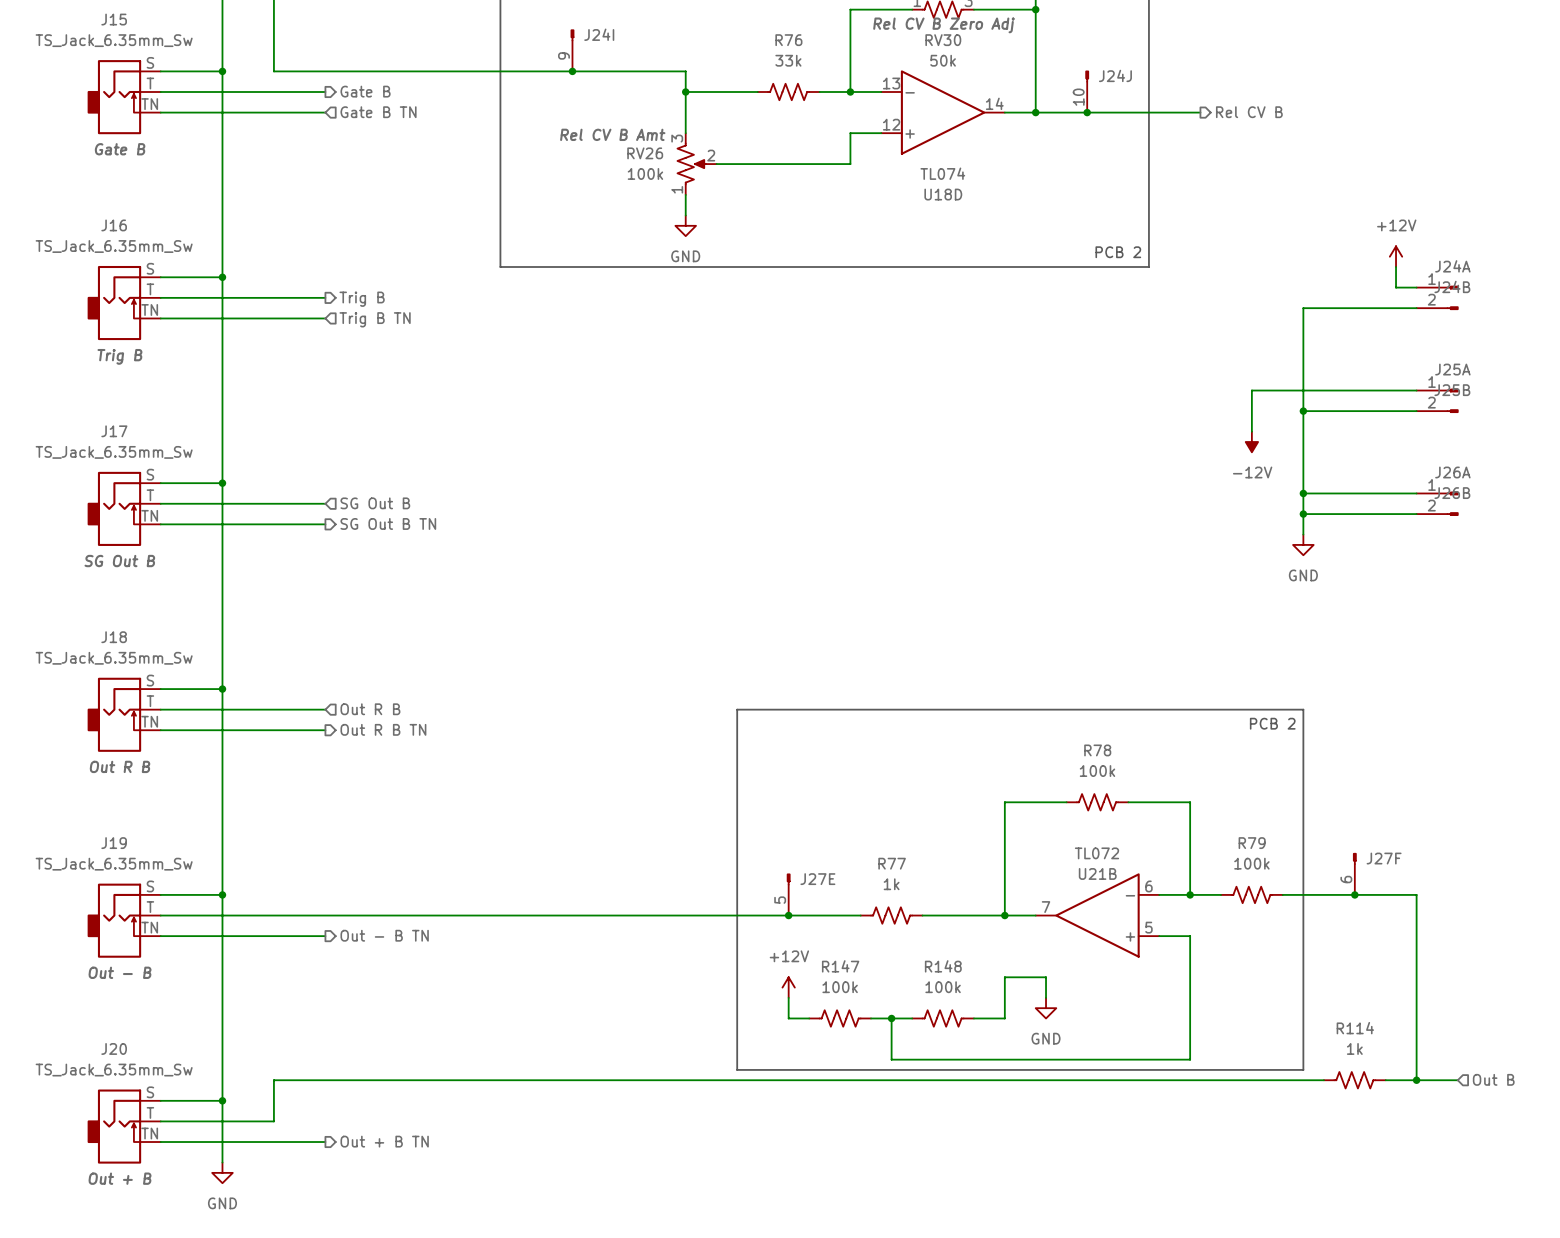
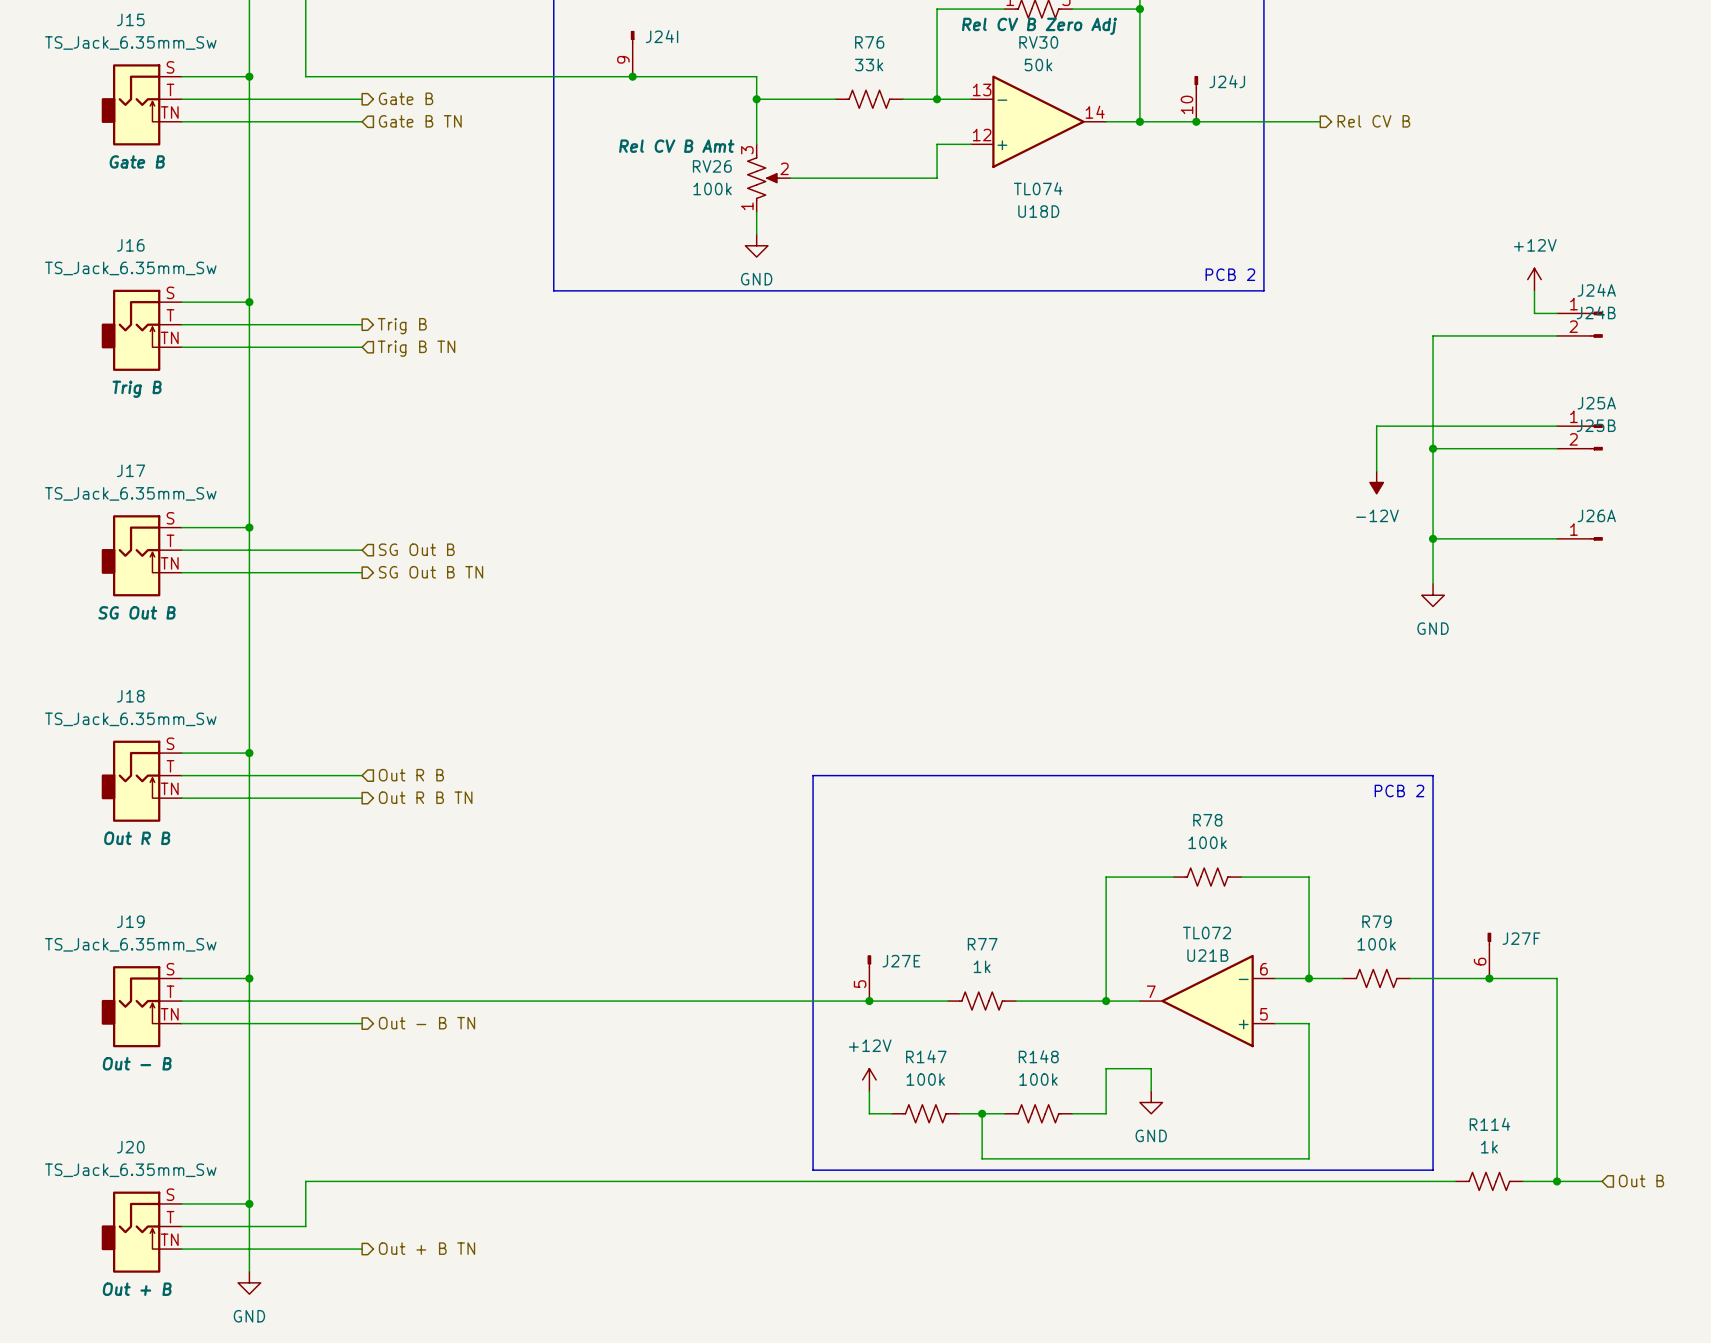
wire: (1303, 514) (1416, 514) -> none
junction: (1303, 514) -> none
J26B: (1437, 514) -> none

